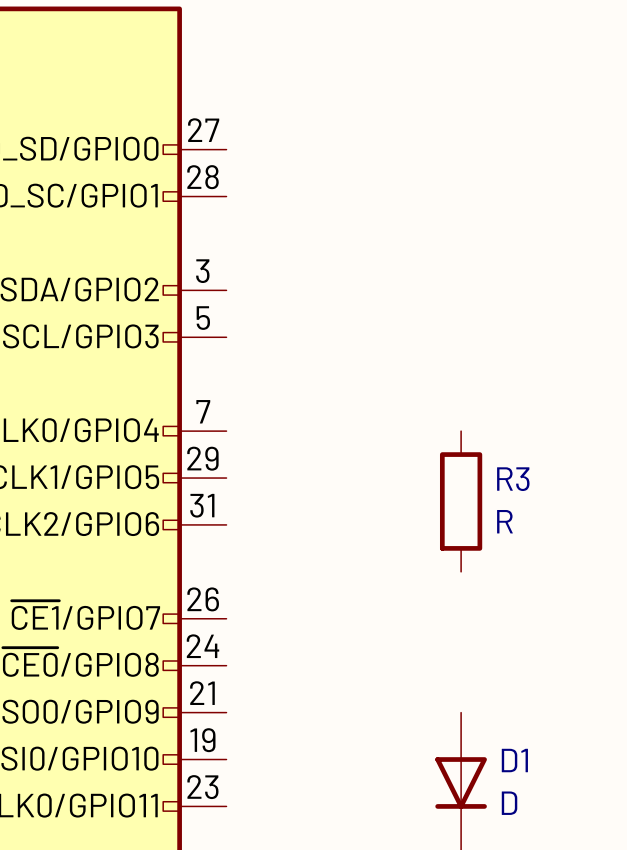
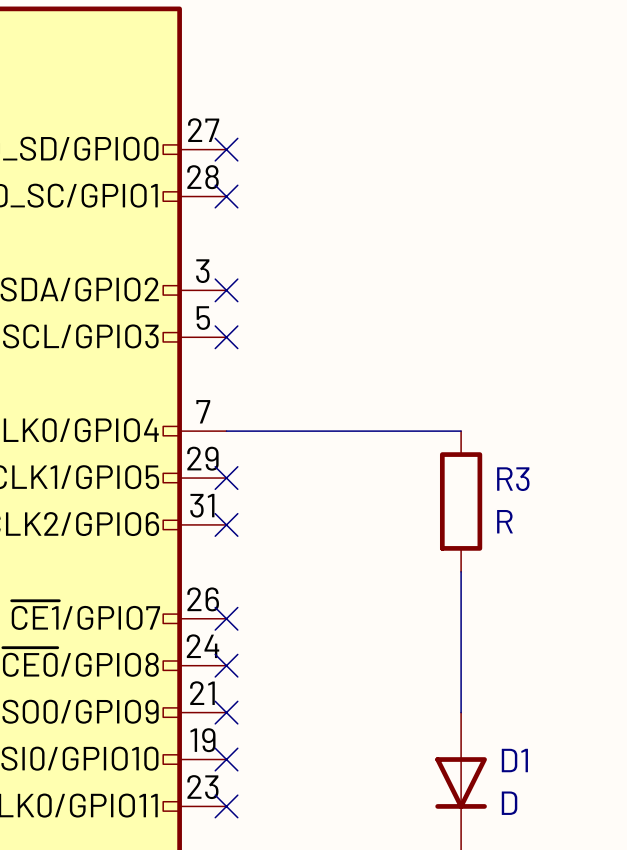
no-connect mark: none -> (226, 149)
no-connect mark: none -> (226, 196)
no-connect mark: none -> (226, 290)
no-connect mark: none -> (226, 337)
wire: none -> (226, 431) (461, 431)
no-connect mark: none -> (226, 478)
no-connect mark: none -> (226, 524)
wire: none -> (461, 571) (461, 712)
no-connect mark: none -> (226, 618)
no-connect mark: none -> (226, 665)
no-connect mark: none -> (226, 712)
no-connect mark: none -> (226, 759)
no-connect mark: none -> (226, 806)

